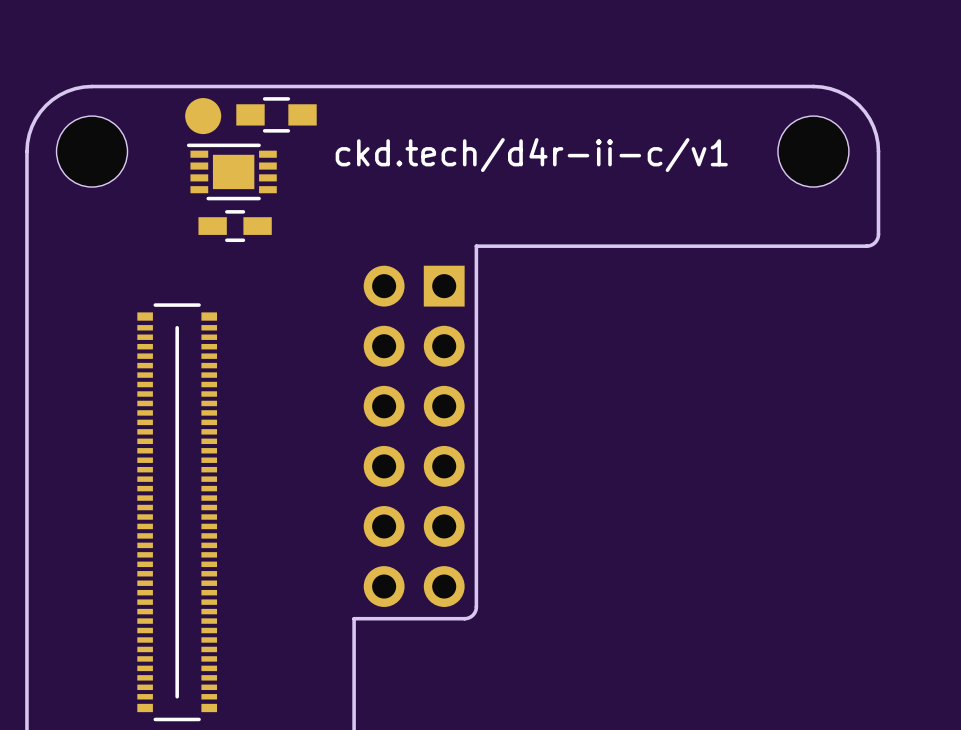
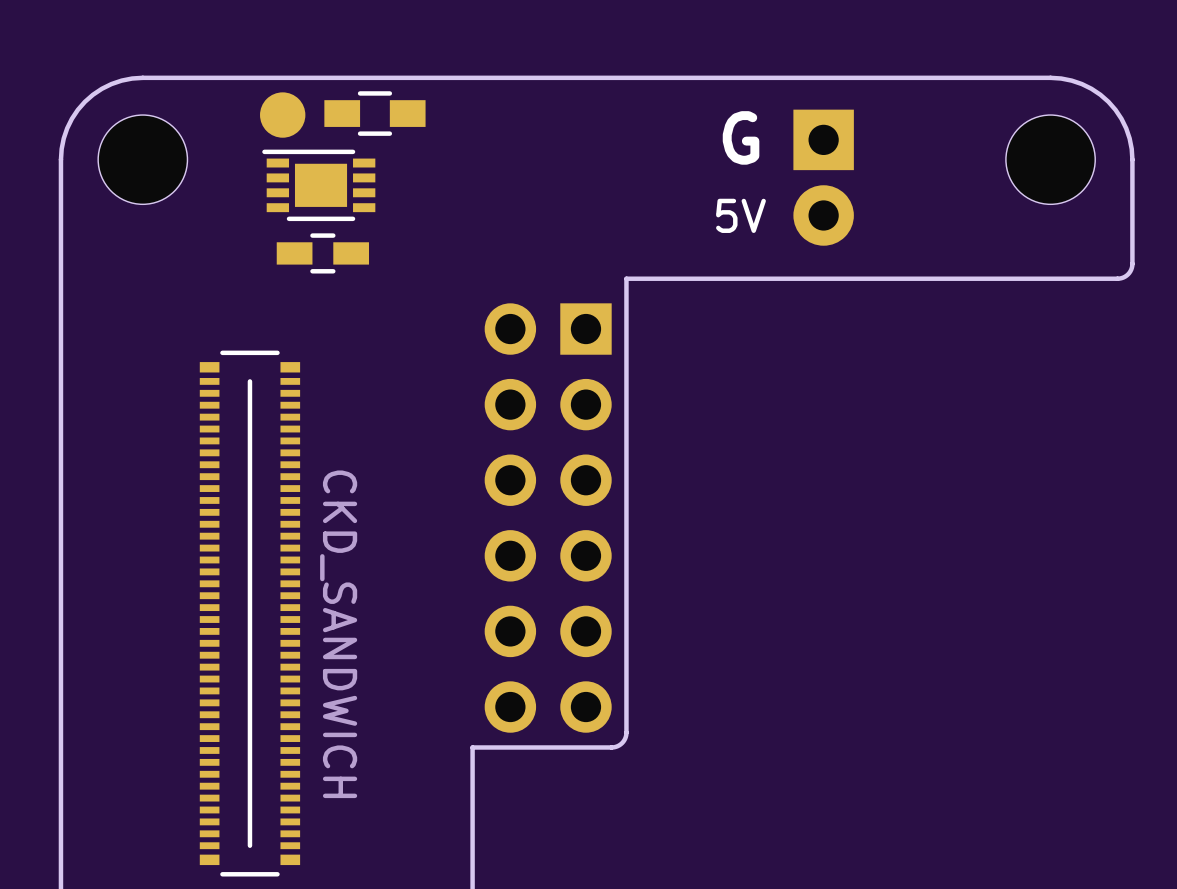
text: none -> G (741, 137)
text: ckd.tech/d4r-ii-c/v1 (531, 155) -> none
part: none -> (823, 177)
text: none -> 5V (740, 215)
part value: none -> CKD_SANDWICH (338, 634)

